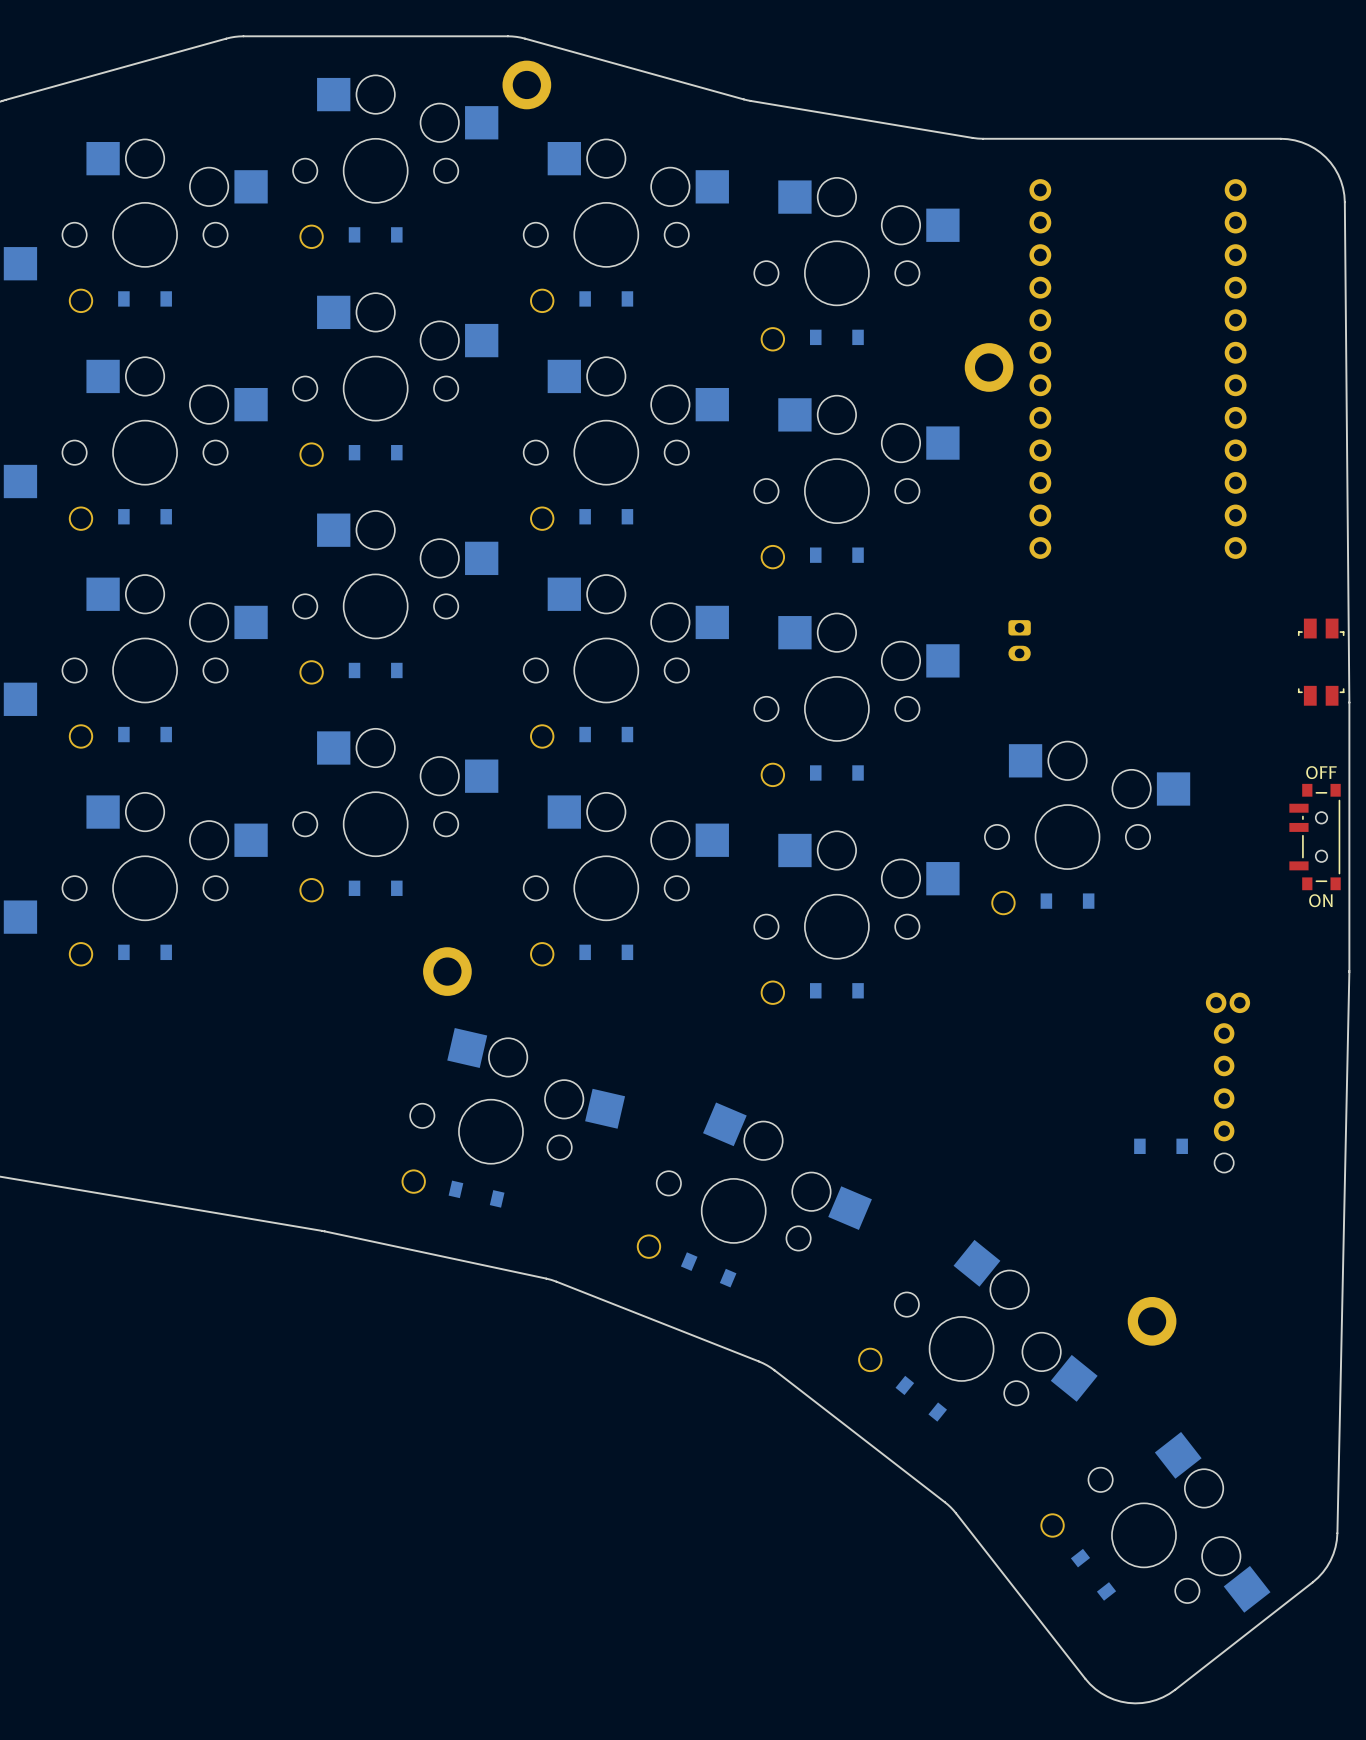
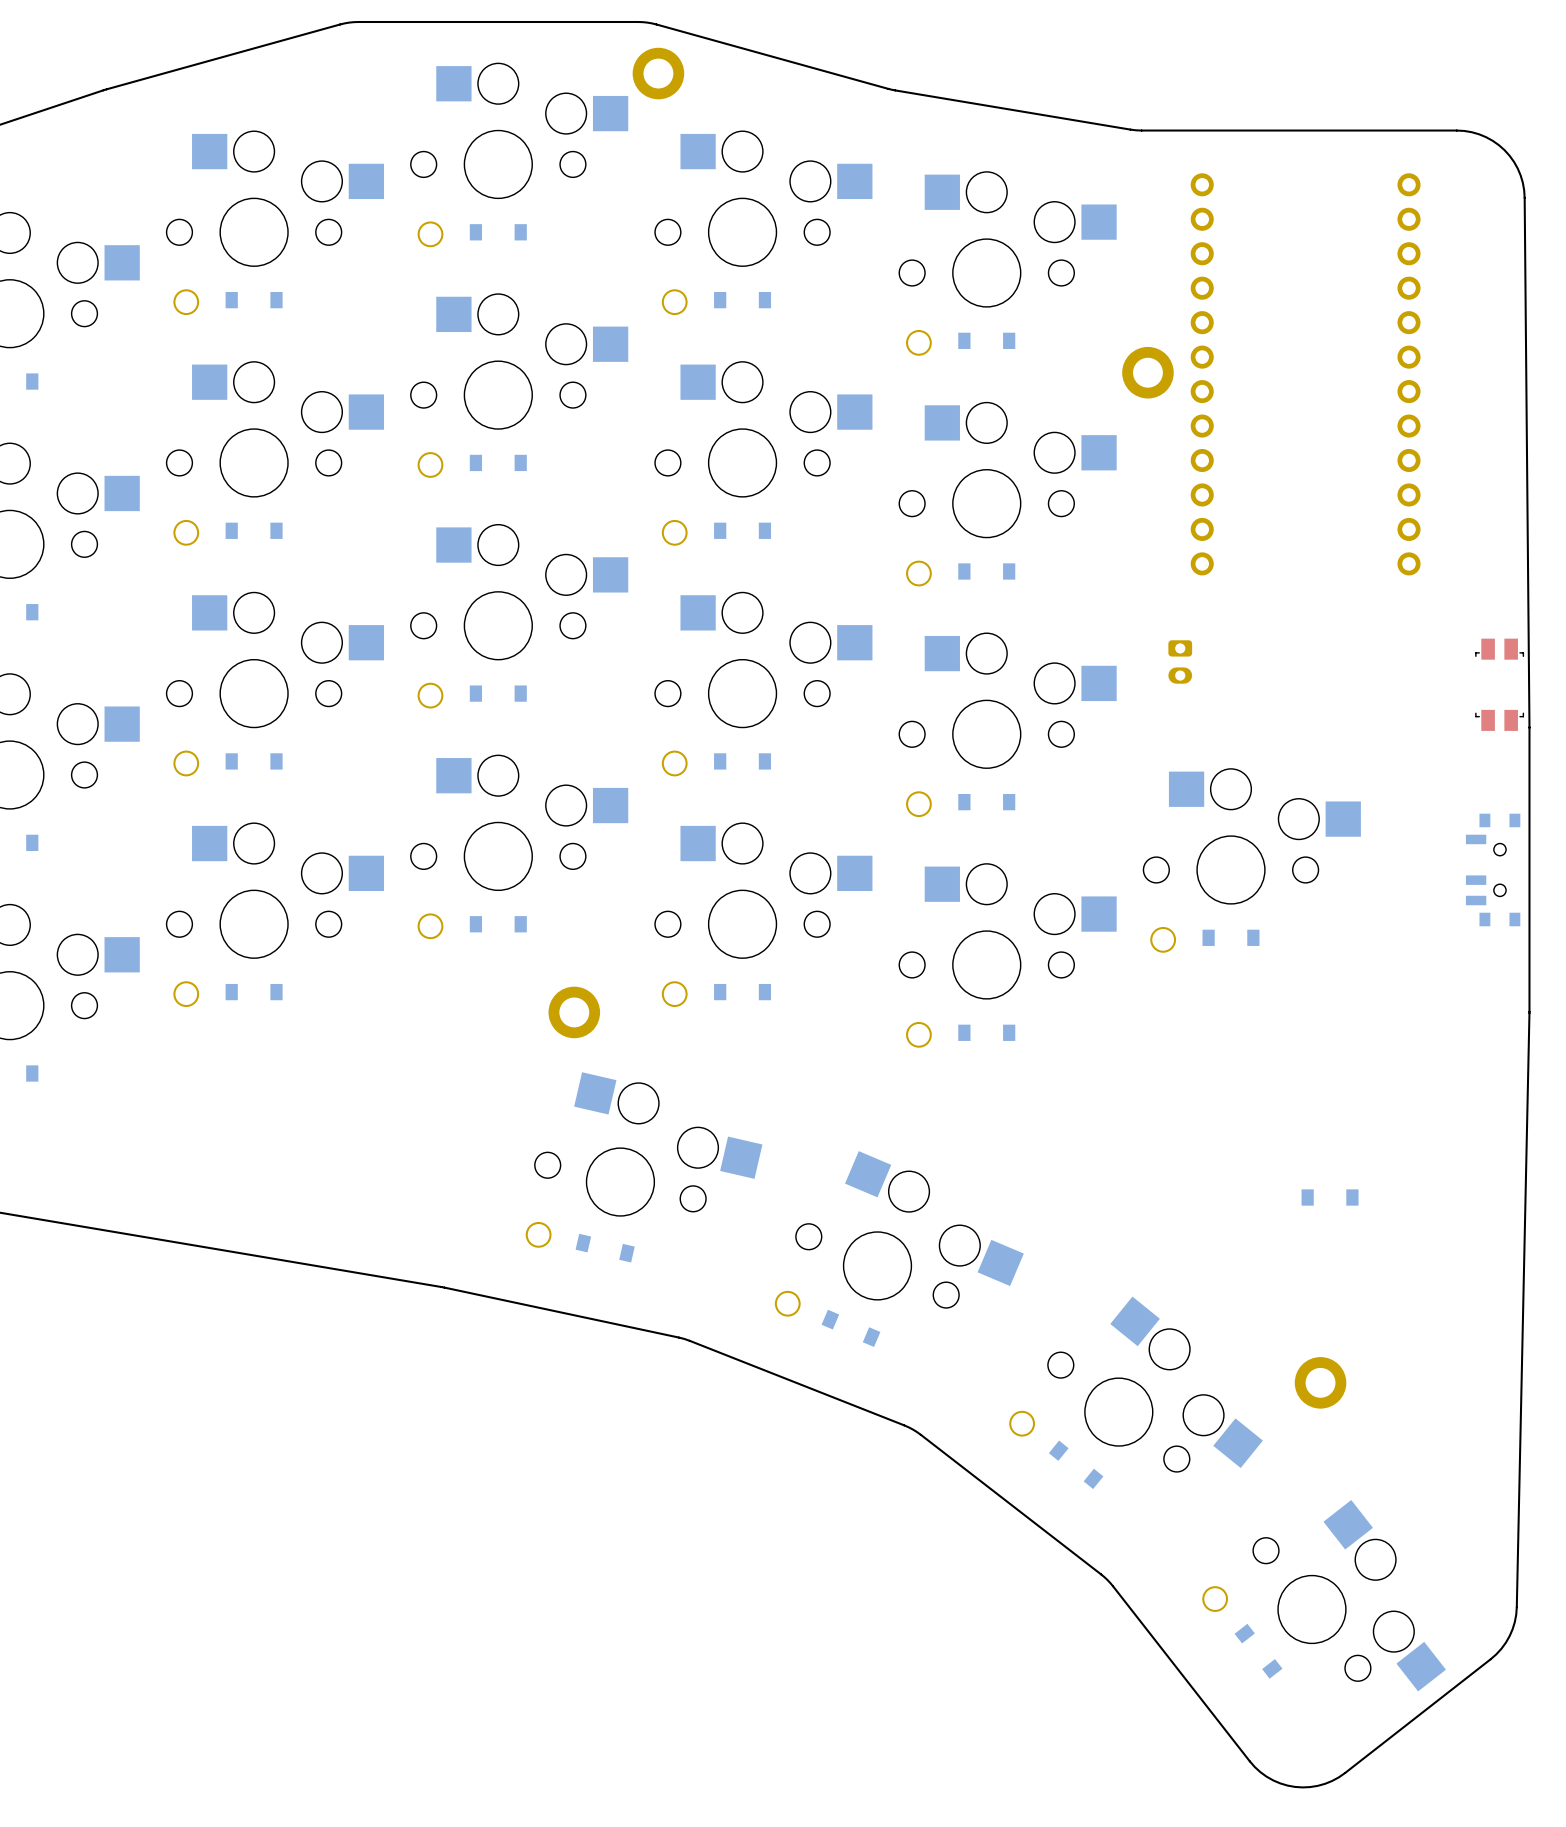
part side: top (1315, 837) -> bottom (1493, 869)
part: (1227, 1082) -> none

